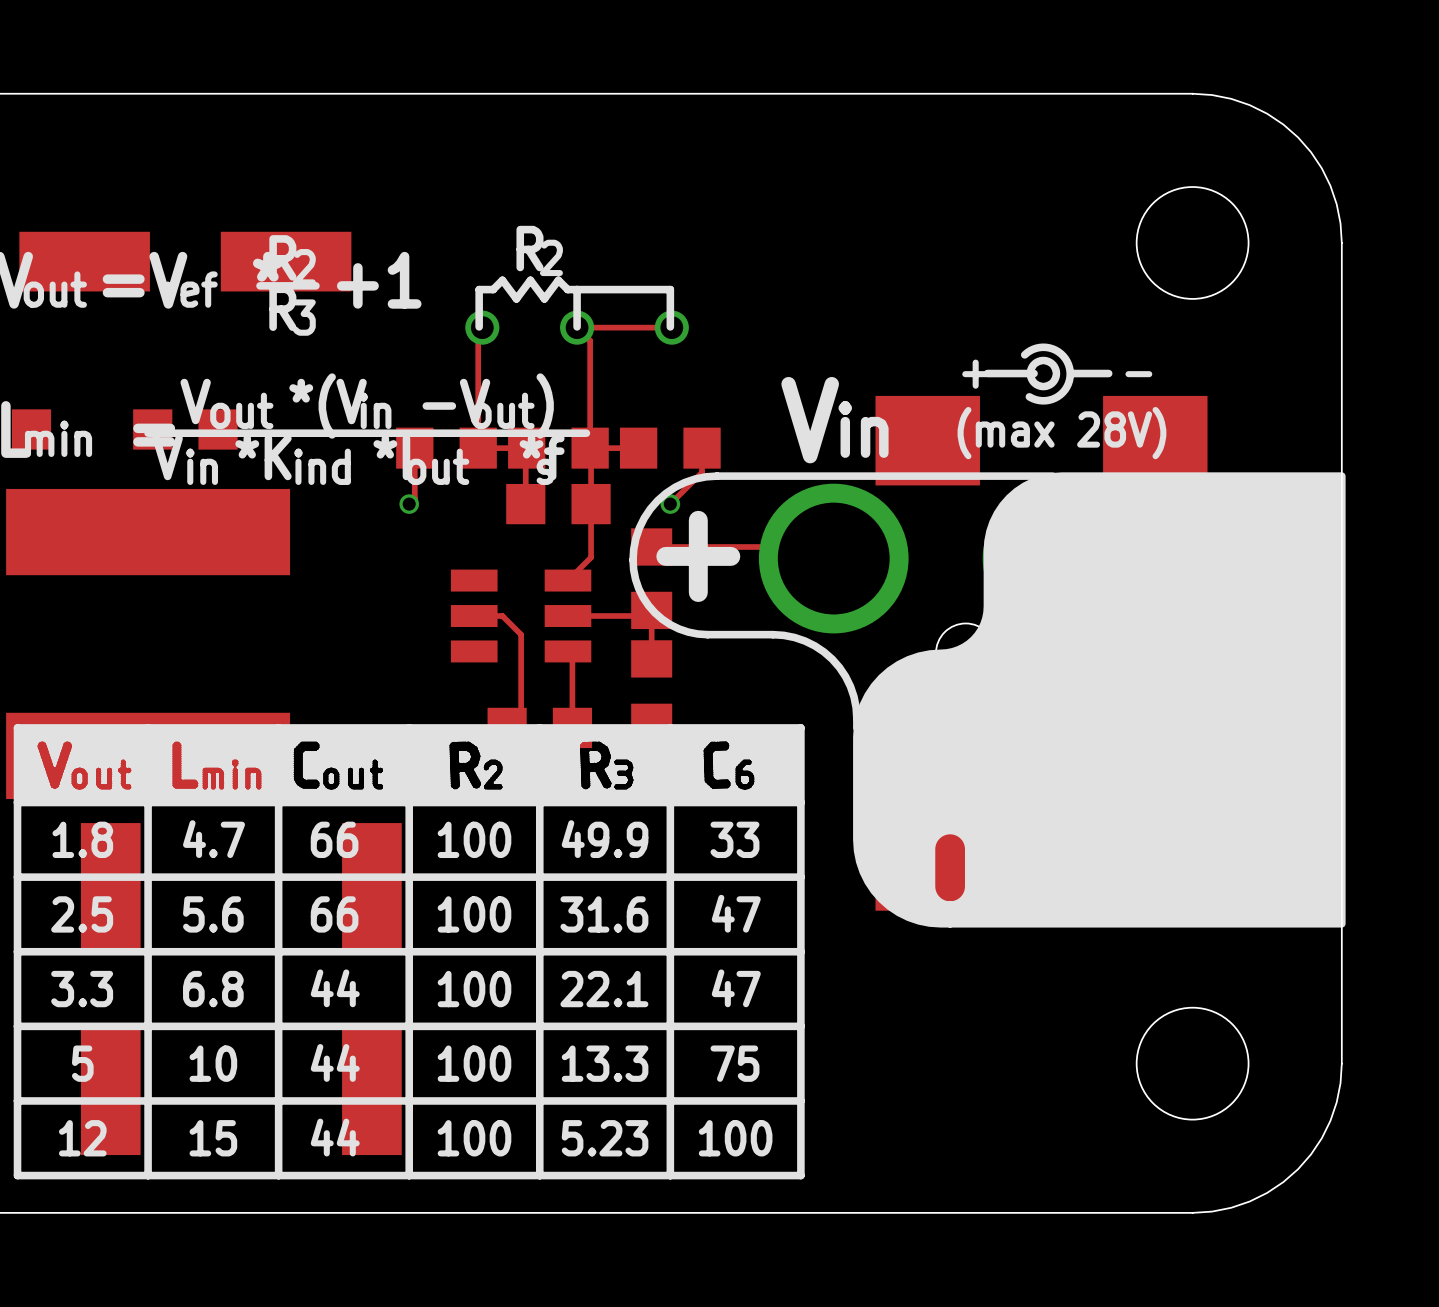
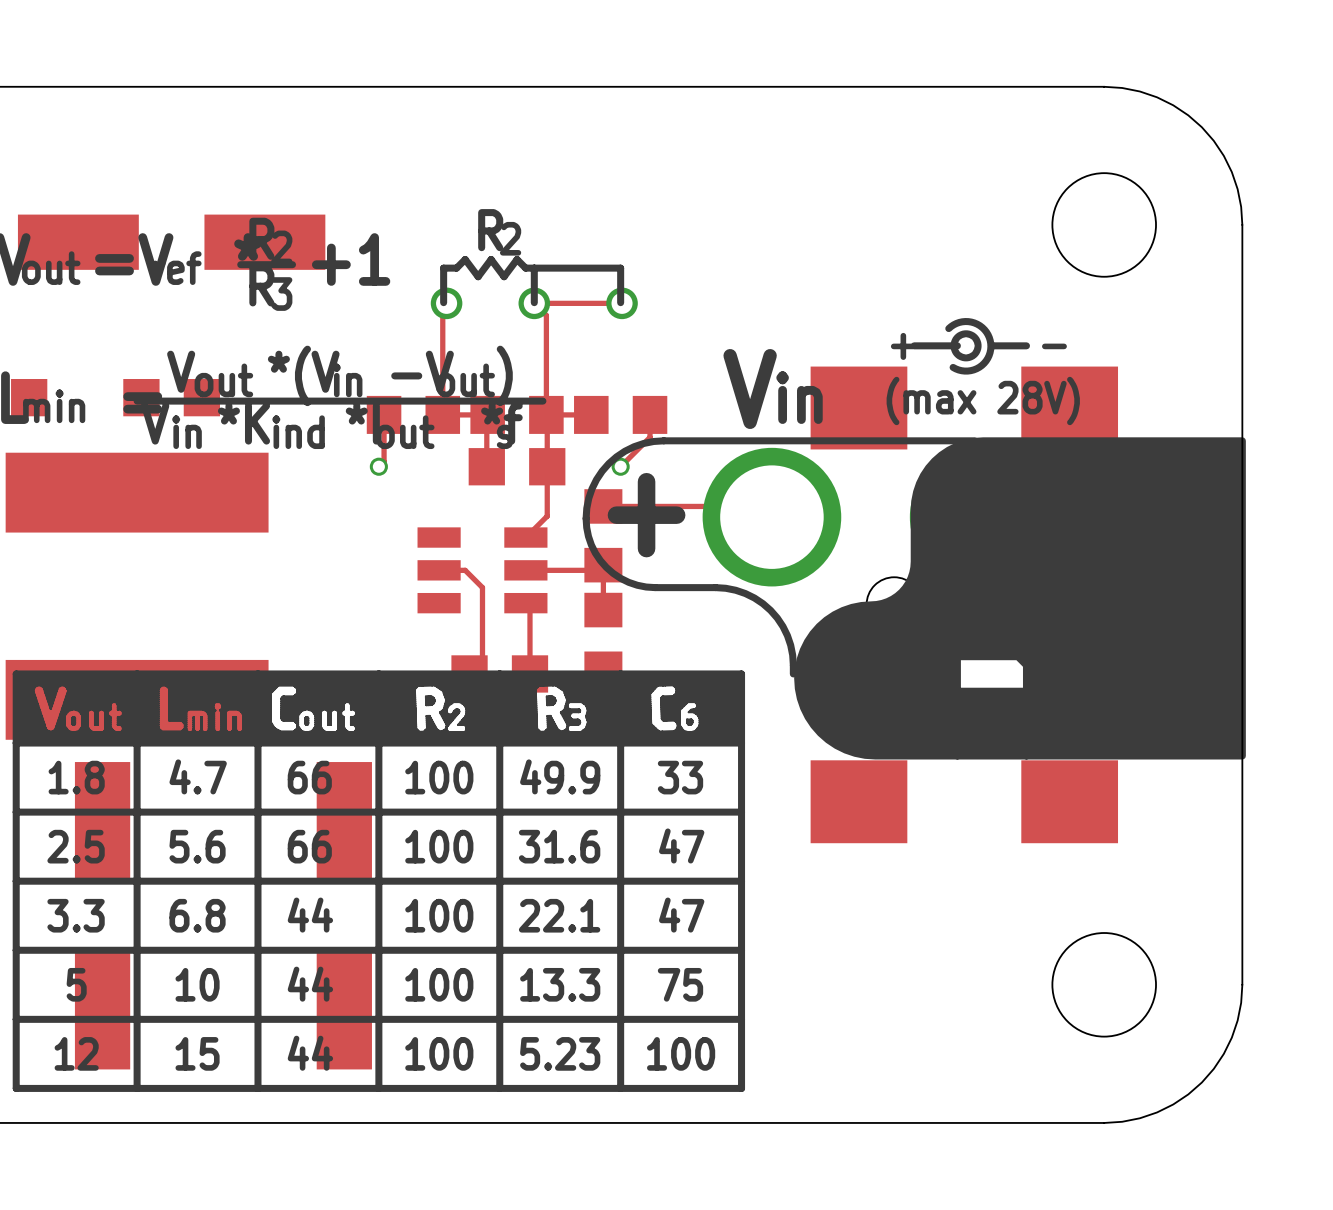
drawing: [853, 472, 1346, 928] -> none
drawing: none -> [794, 437, 1246, 760]

